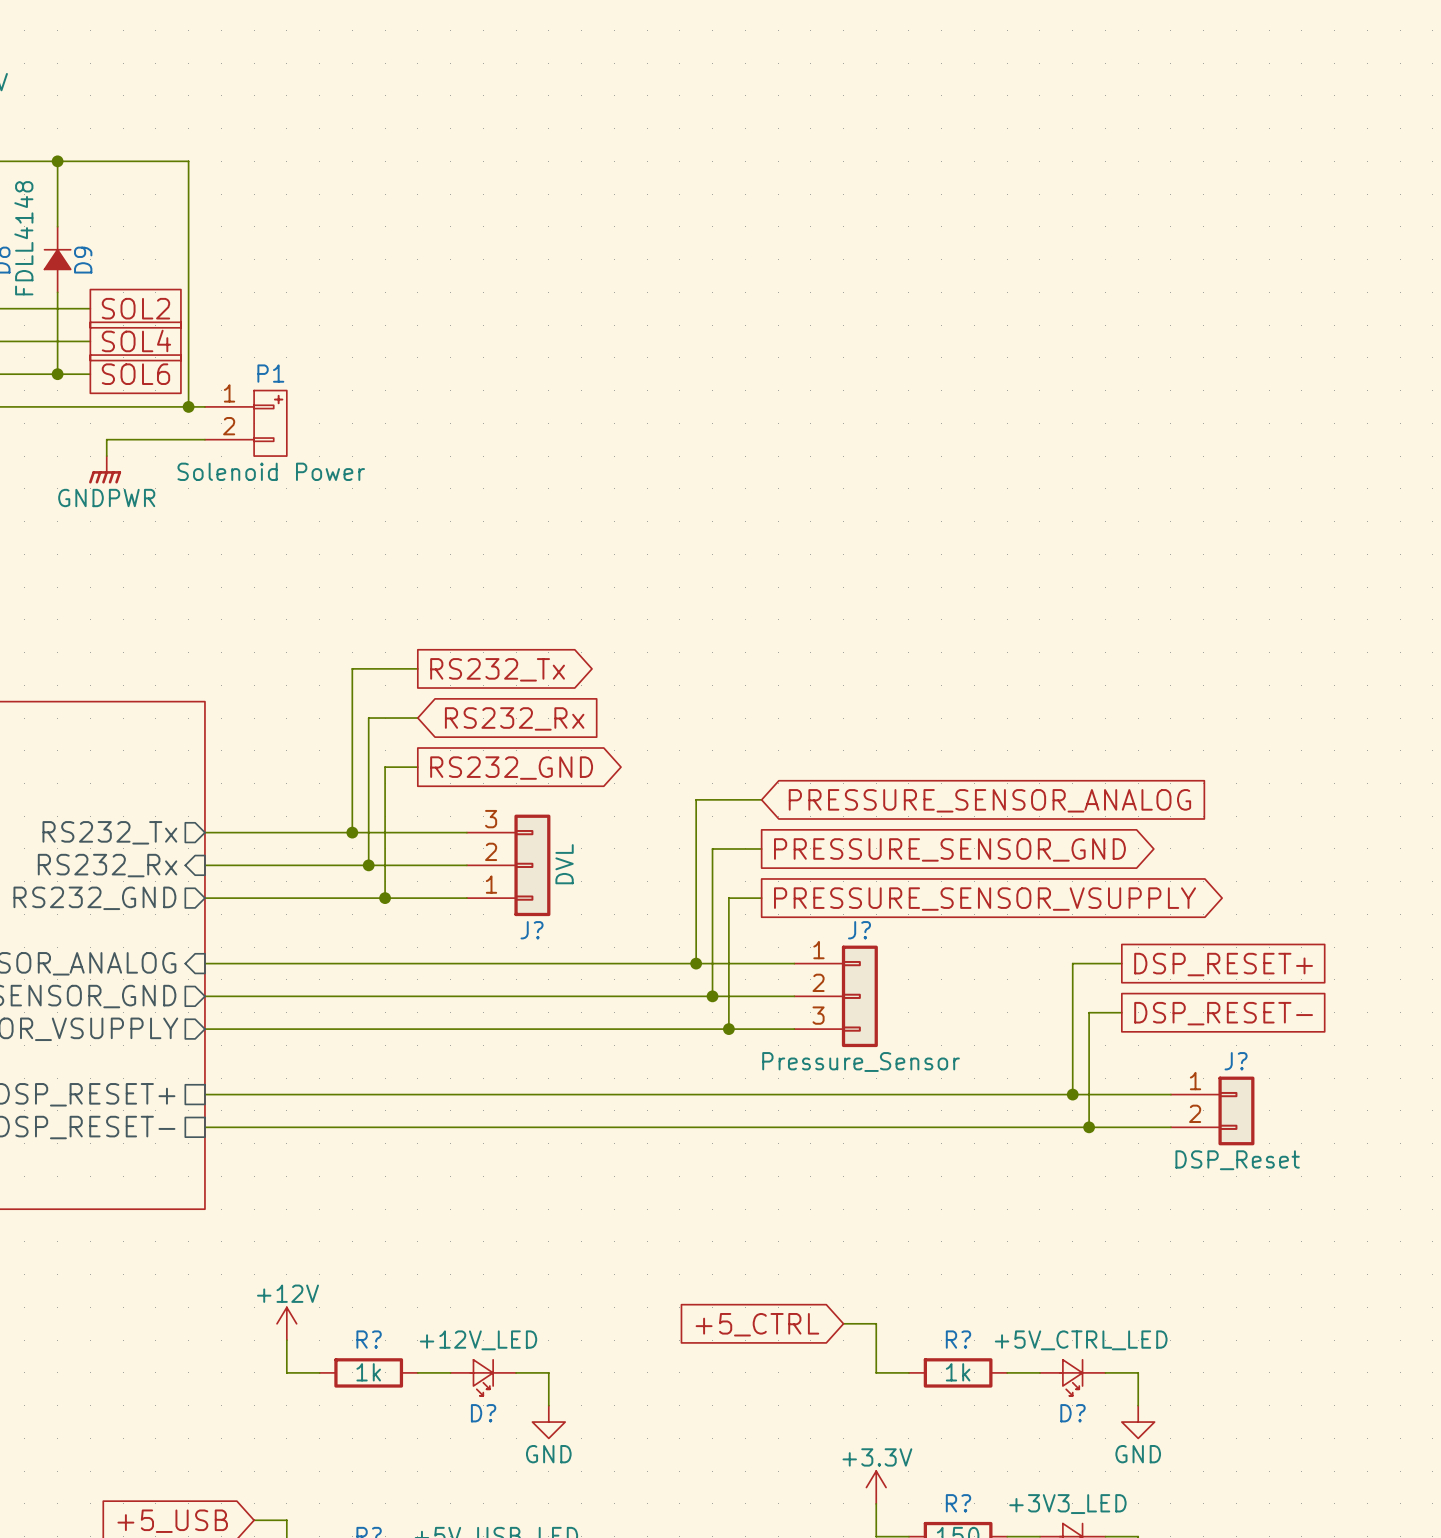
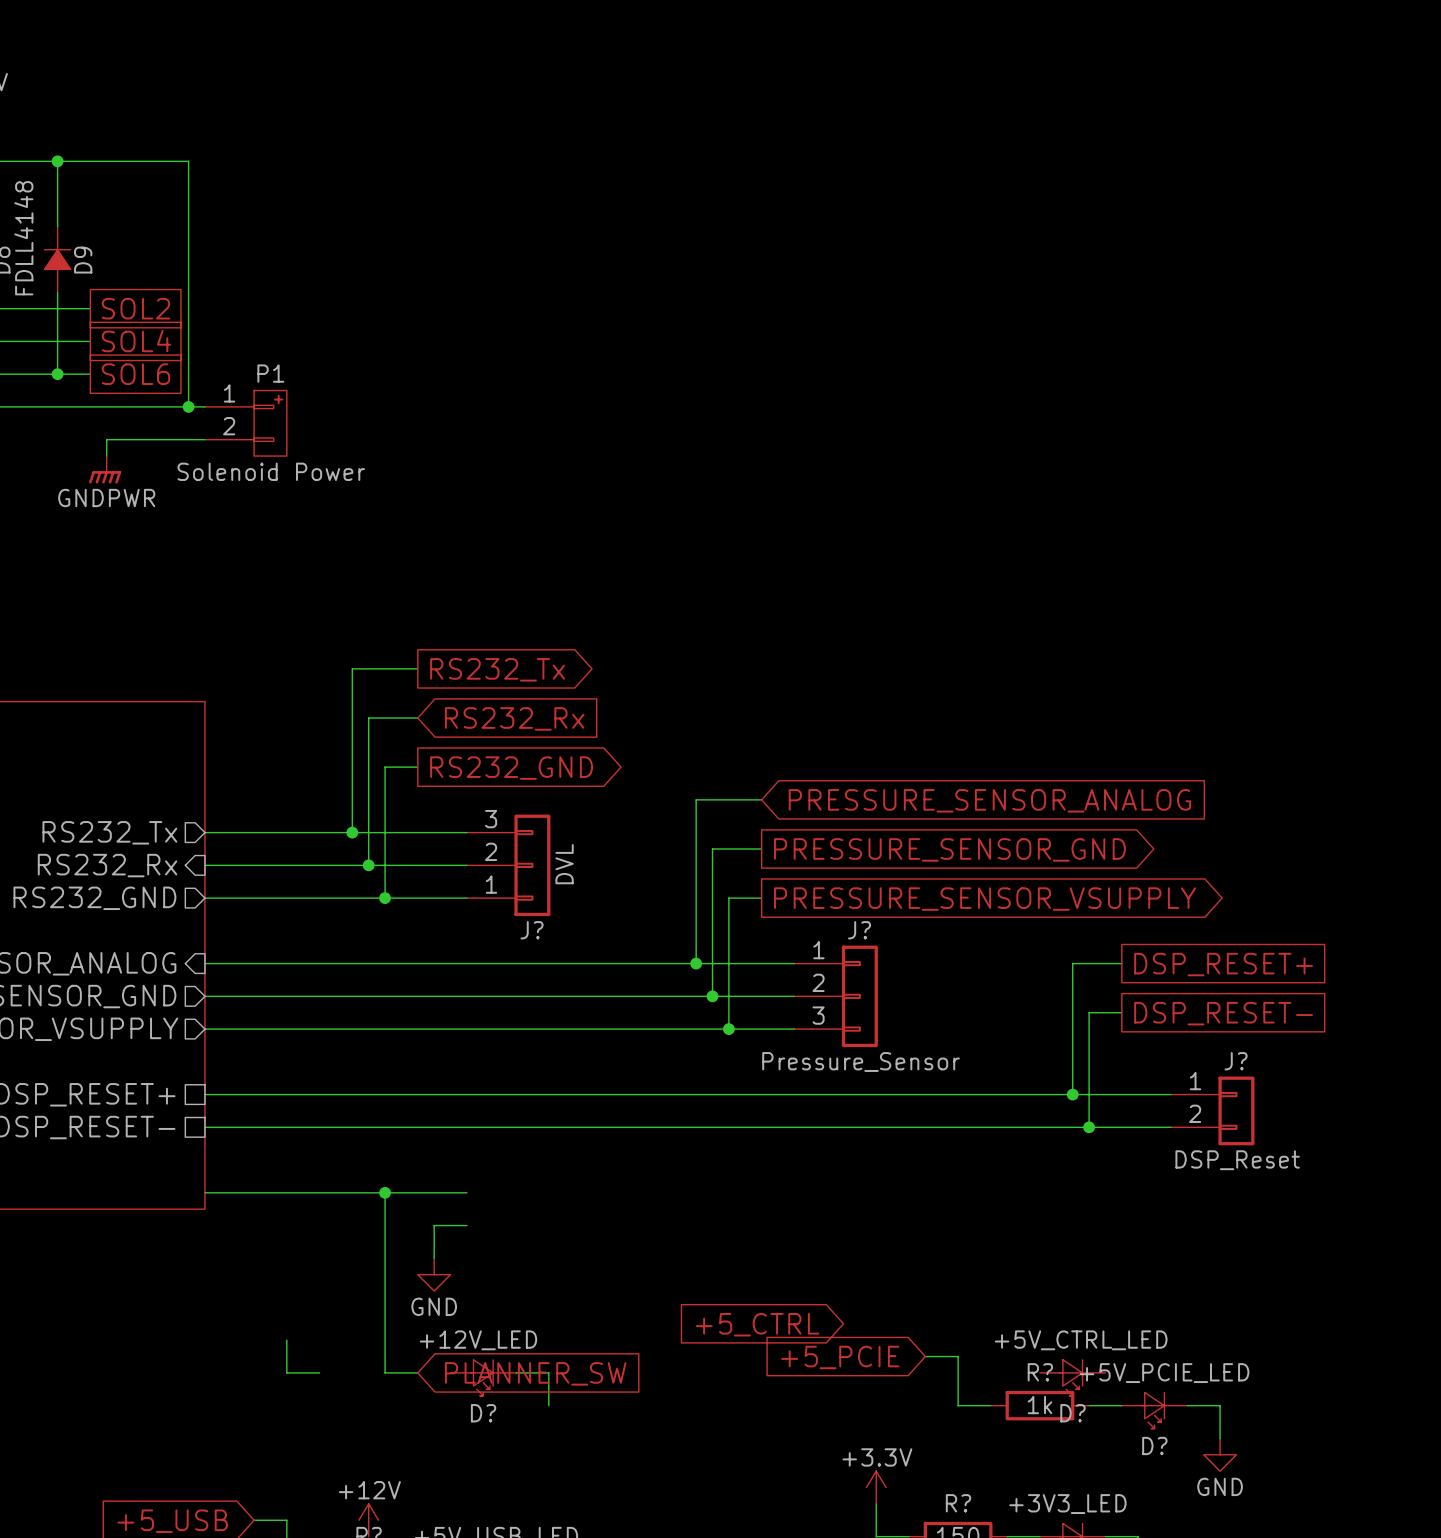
wire: none -> (204, 1192) (466, 1192)
junction: none -> (385, 1192)
wire: none -> (466, 1225) (434, 1225) (434, 1258)
power symbol: none -> GND (434, 1274)
power symbol position: +12V (286, 1323) -> +12V (368, 1520)
wire: (843, 1323) (876, 1323) (876, 1372) (908, 1372) -> (925, 1356) (958, 1356) (958, 1405) (990, 1405)
global label: none -> +5_PCIE (840, 1357)
R?: 1k (368, 1372) -> none
wire: (417, 1372) (450, 1372) -> (417, 1372) (385, 1372) (385, 1192)
R? position: (958, 1372) -> (1039, 1405)
wire: (1007, 1372) (1039, 1372) -> (1089, 1405) (1121, 1405)
wire: (1105, 1372) (1138, 1372) (1138, 1405) -> (1187, 1405) (1220, 1405) (1220, 1438)
global label: none -> PLANNER_SW (535, 1373)
D?: none -> +5V_PCIE_LED (1154, 1410)
power symbol: GND (548, 1422) -> none
power symbol: GND (1138, 1422) -> none
power symbol: none -> GND (1220, 1454)

